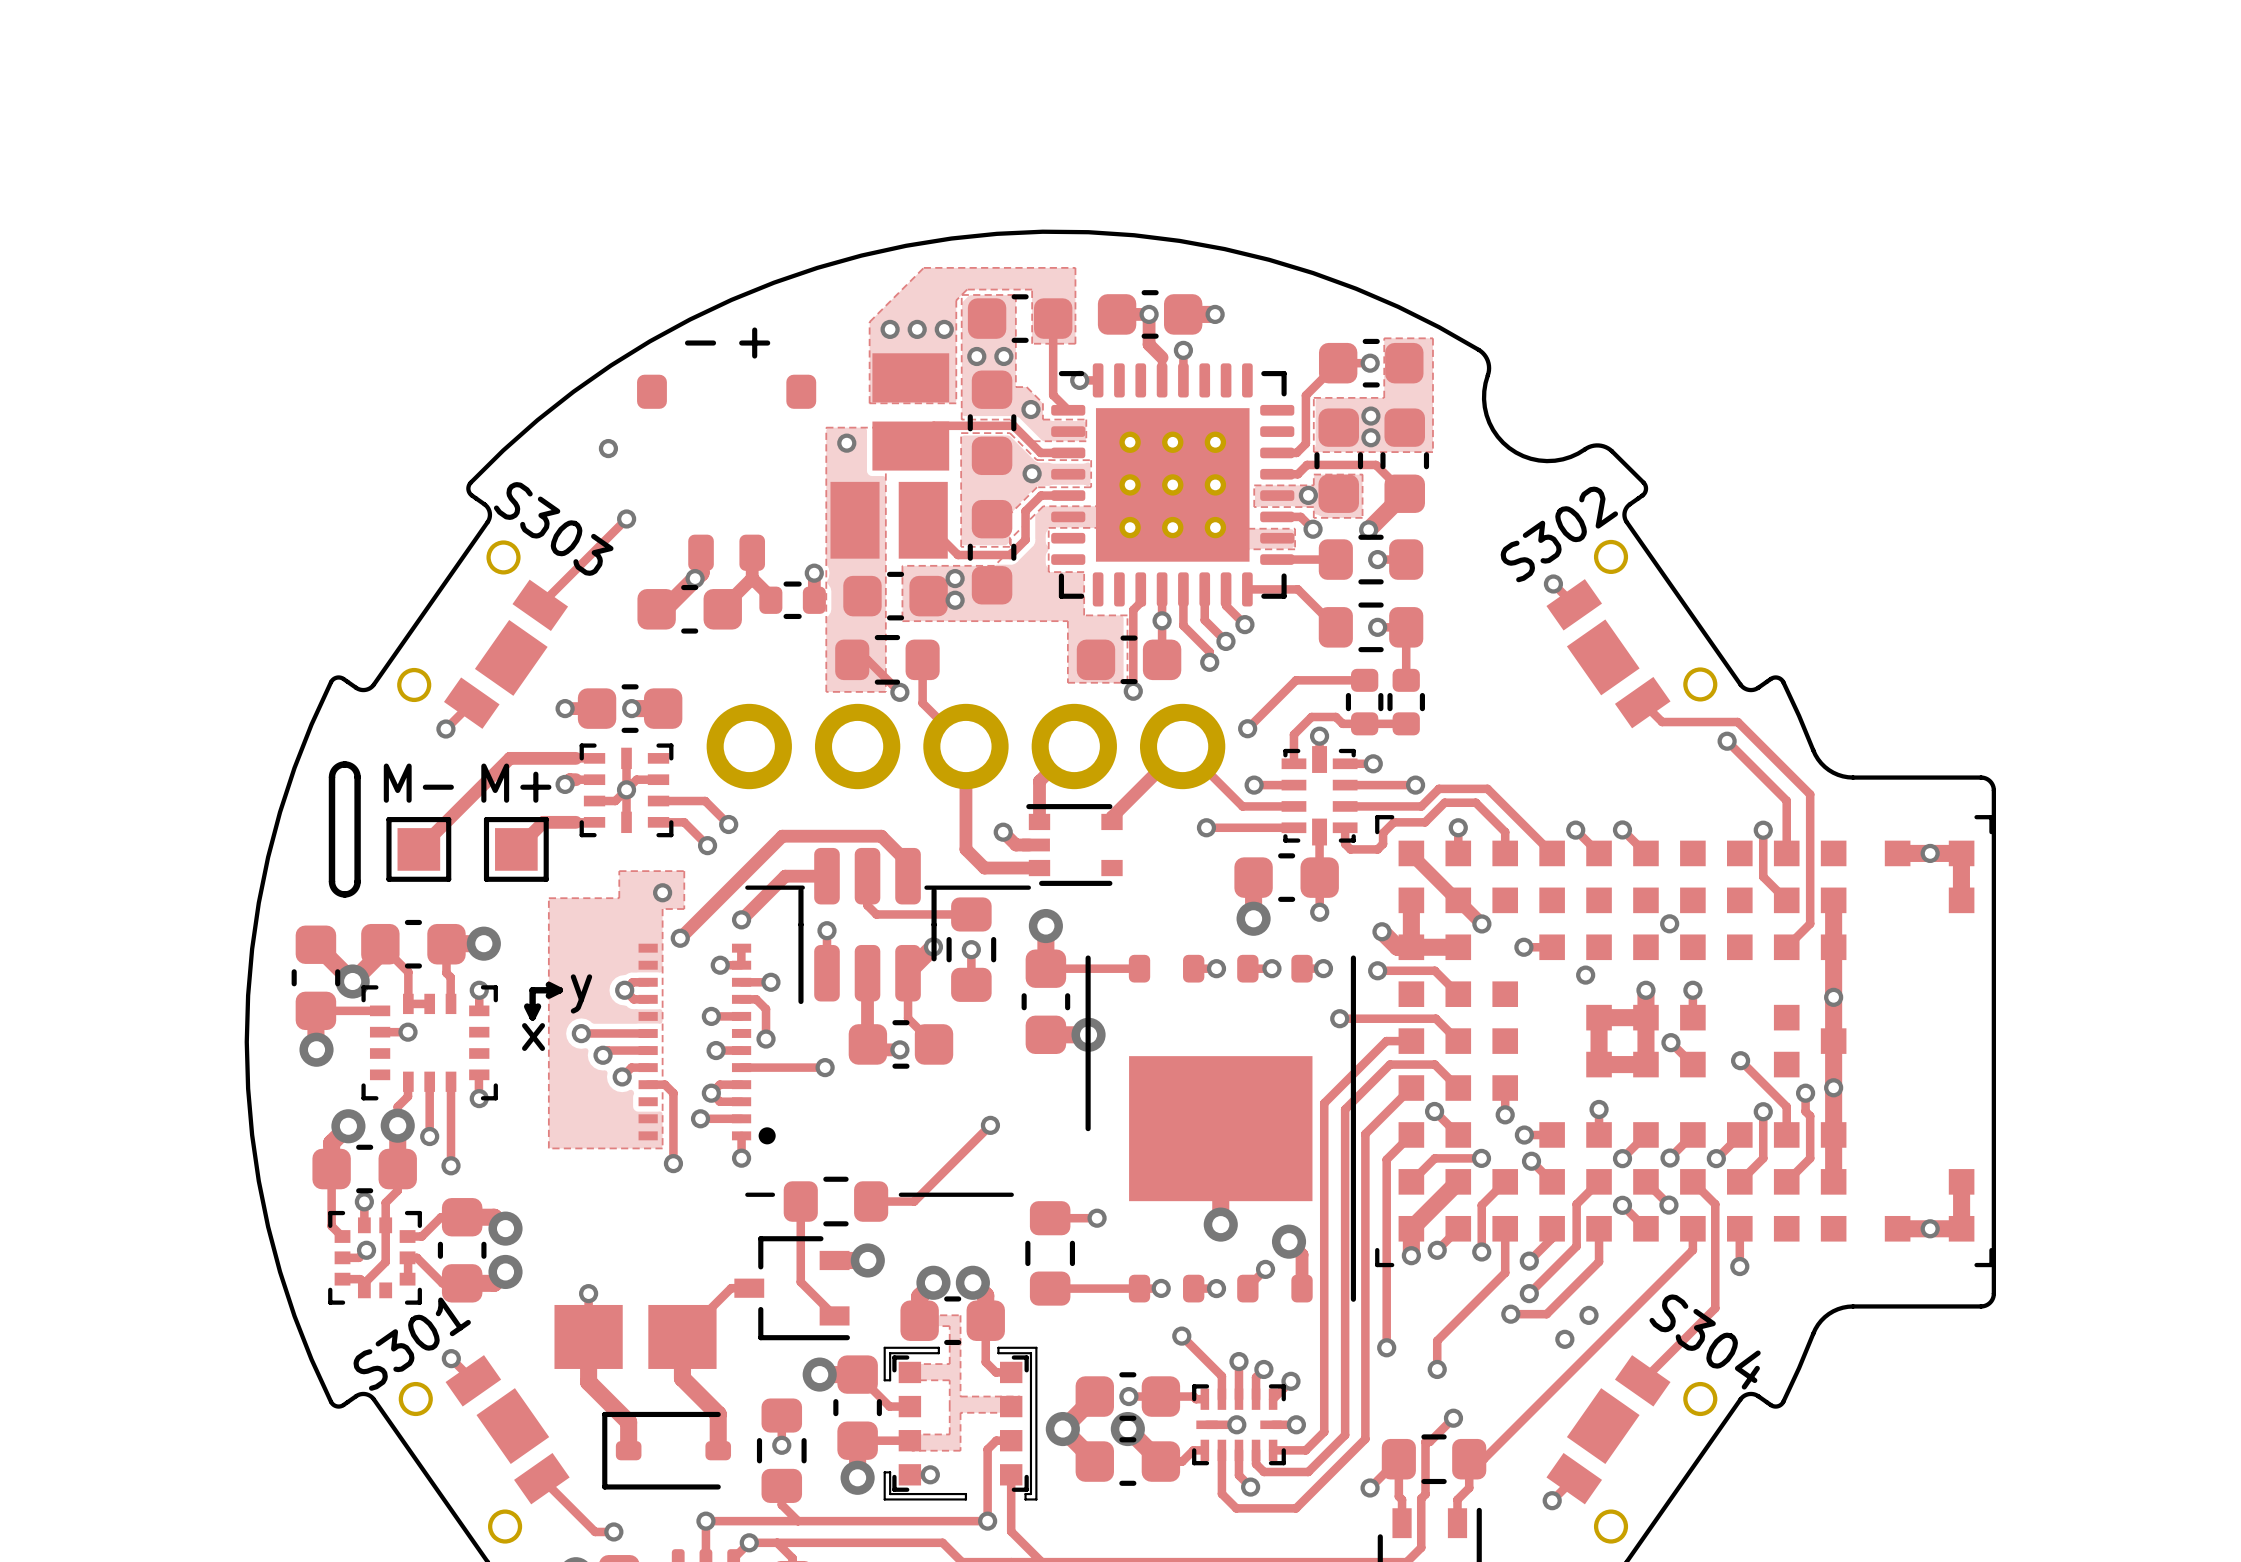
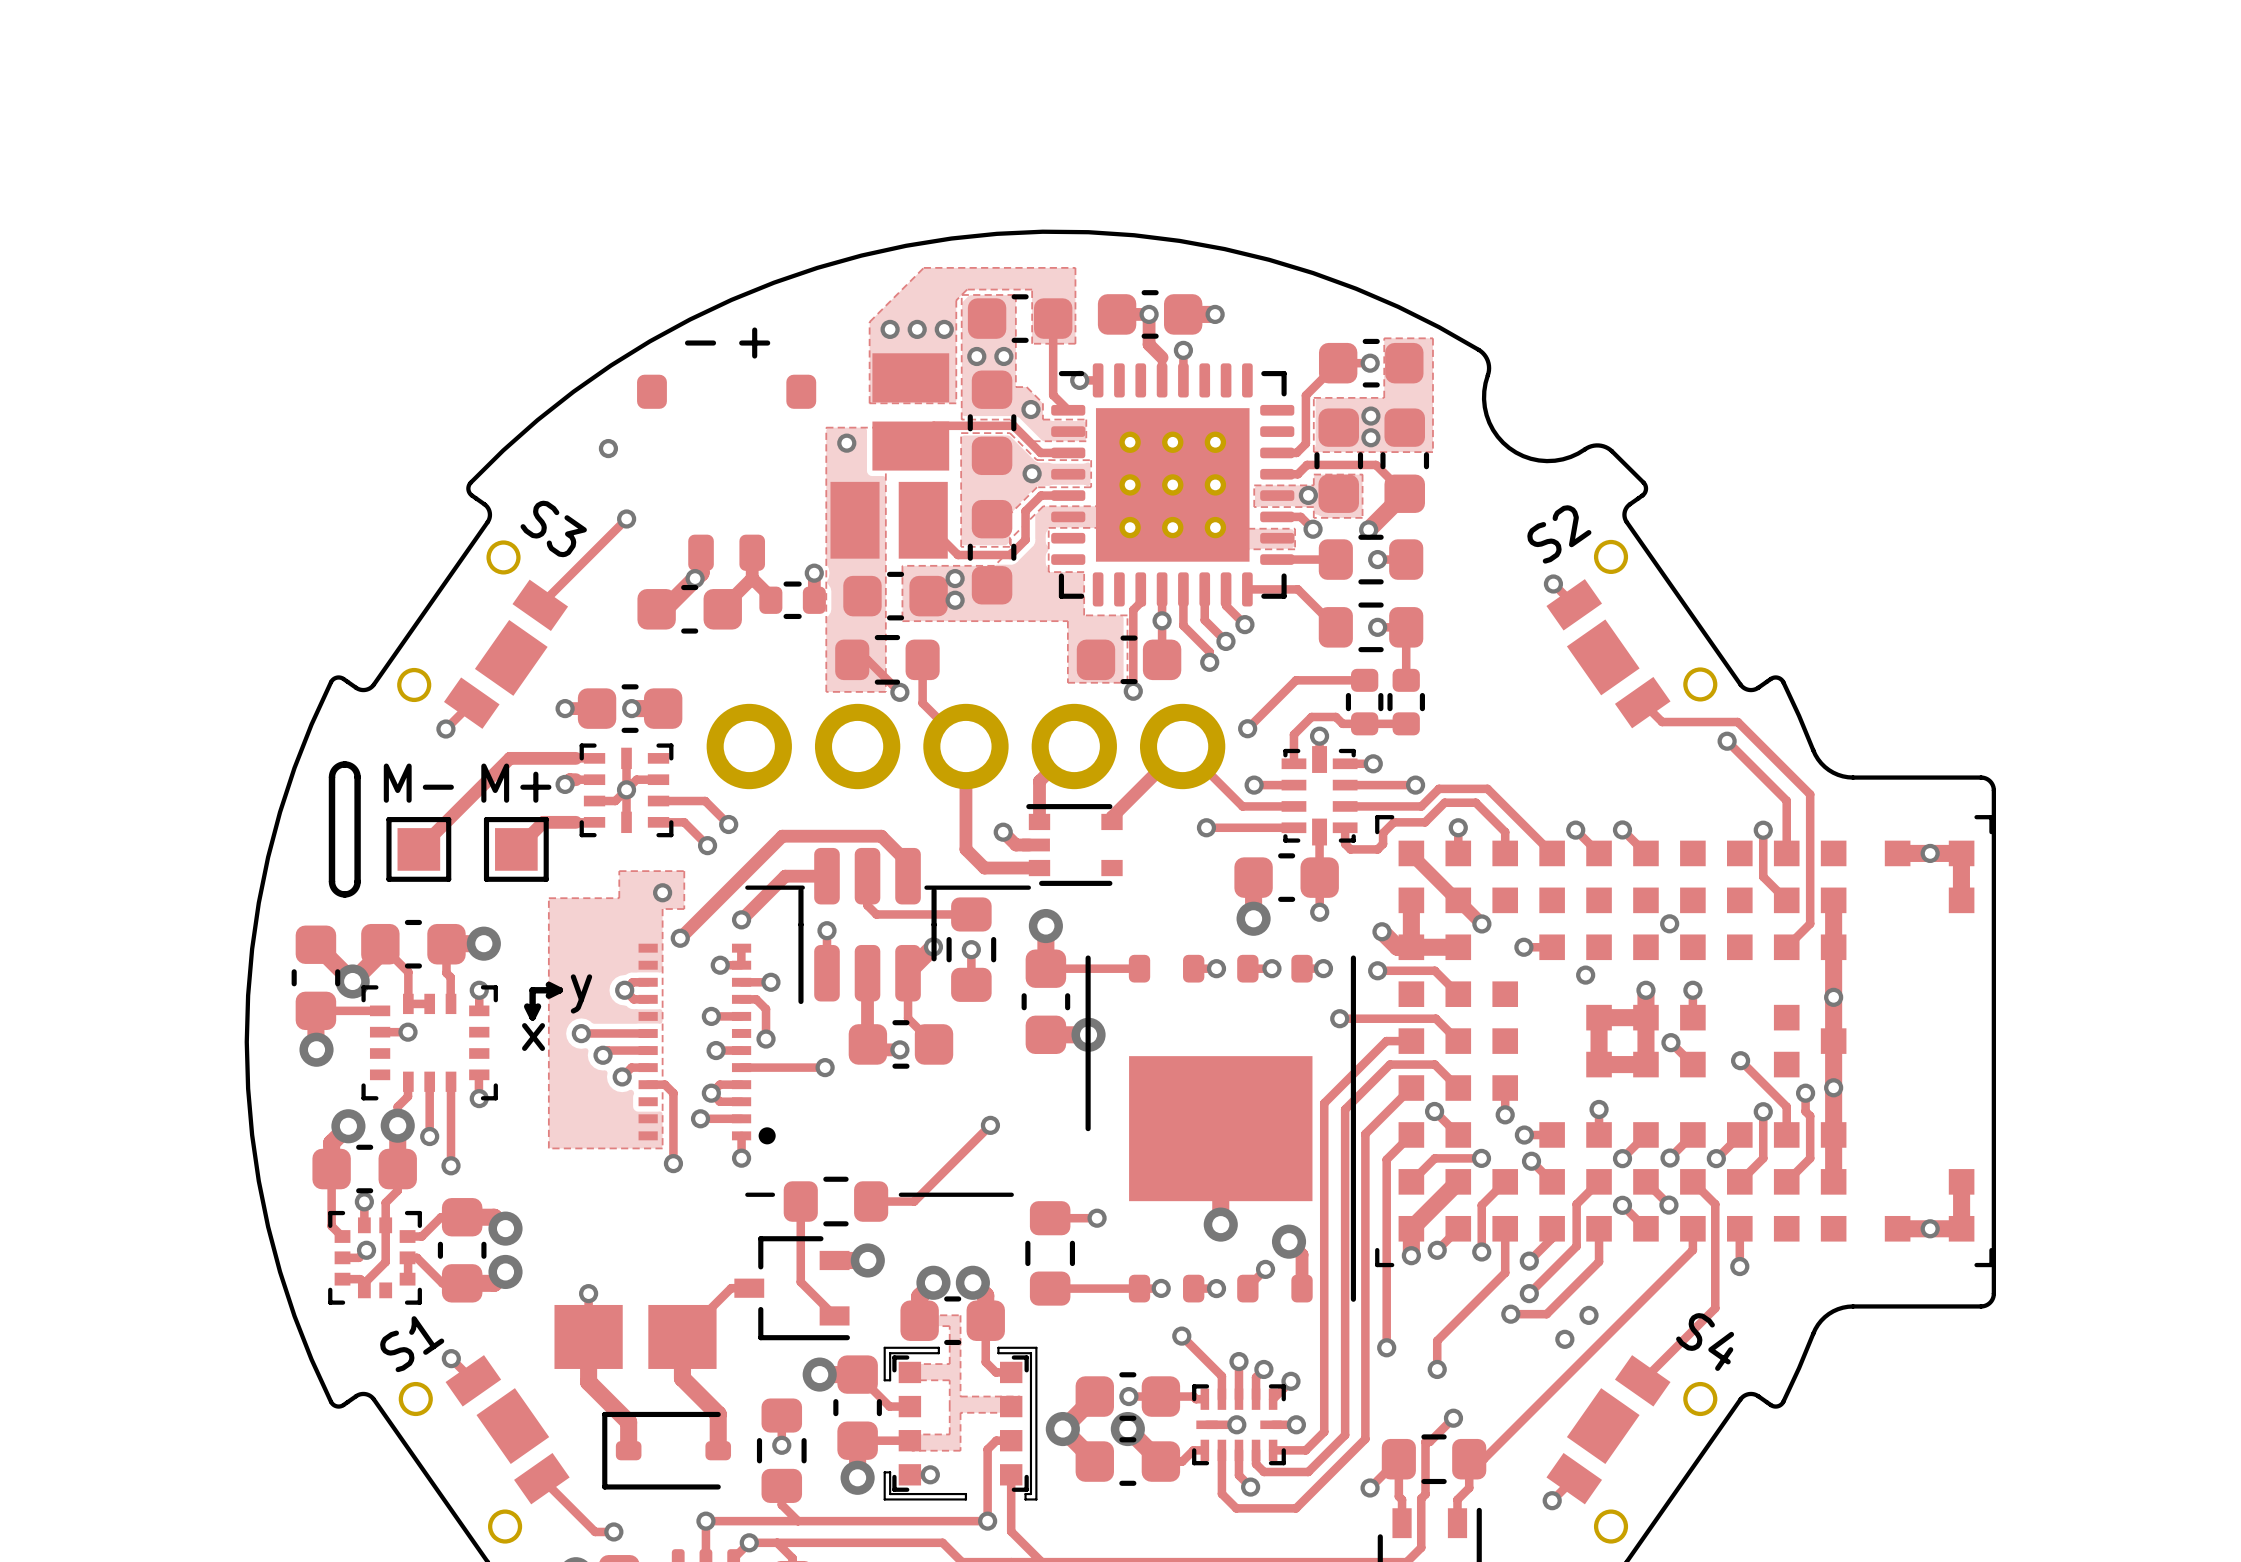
S303 name: S303 (553, 528) -> S3 (553, 528)
S302 name: S302 (1559, 534) -> S2 (1559, 534)
S304 name: S304 (1705, 1341) -> S4 (1705, 1341)
S301 name: S301 (412, 1344) -> S1 (412, 1344)

